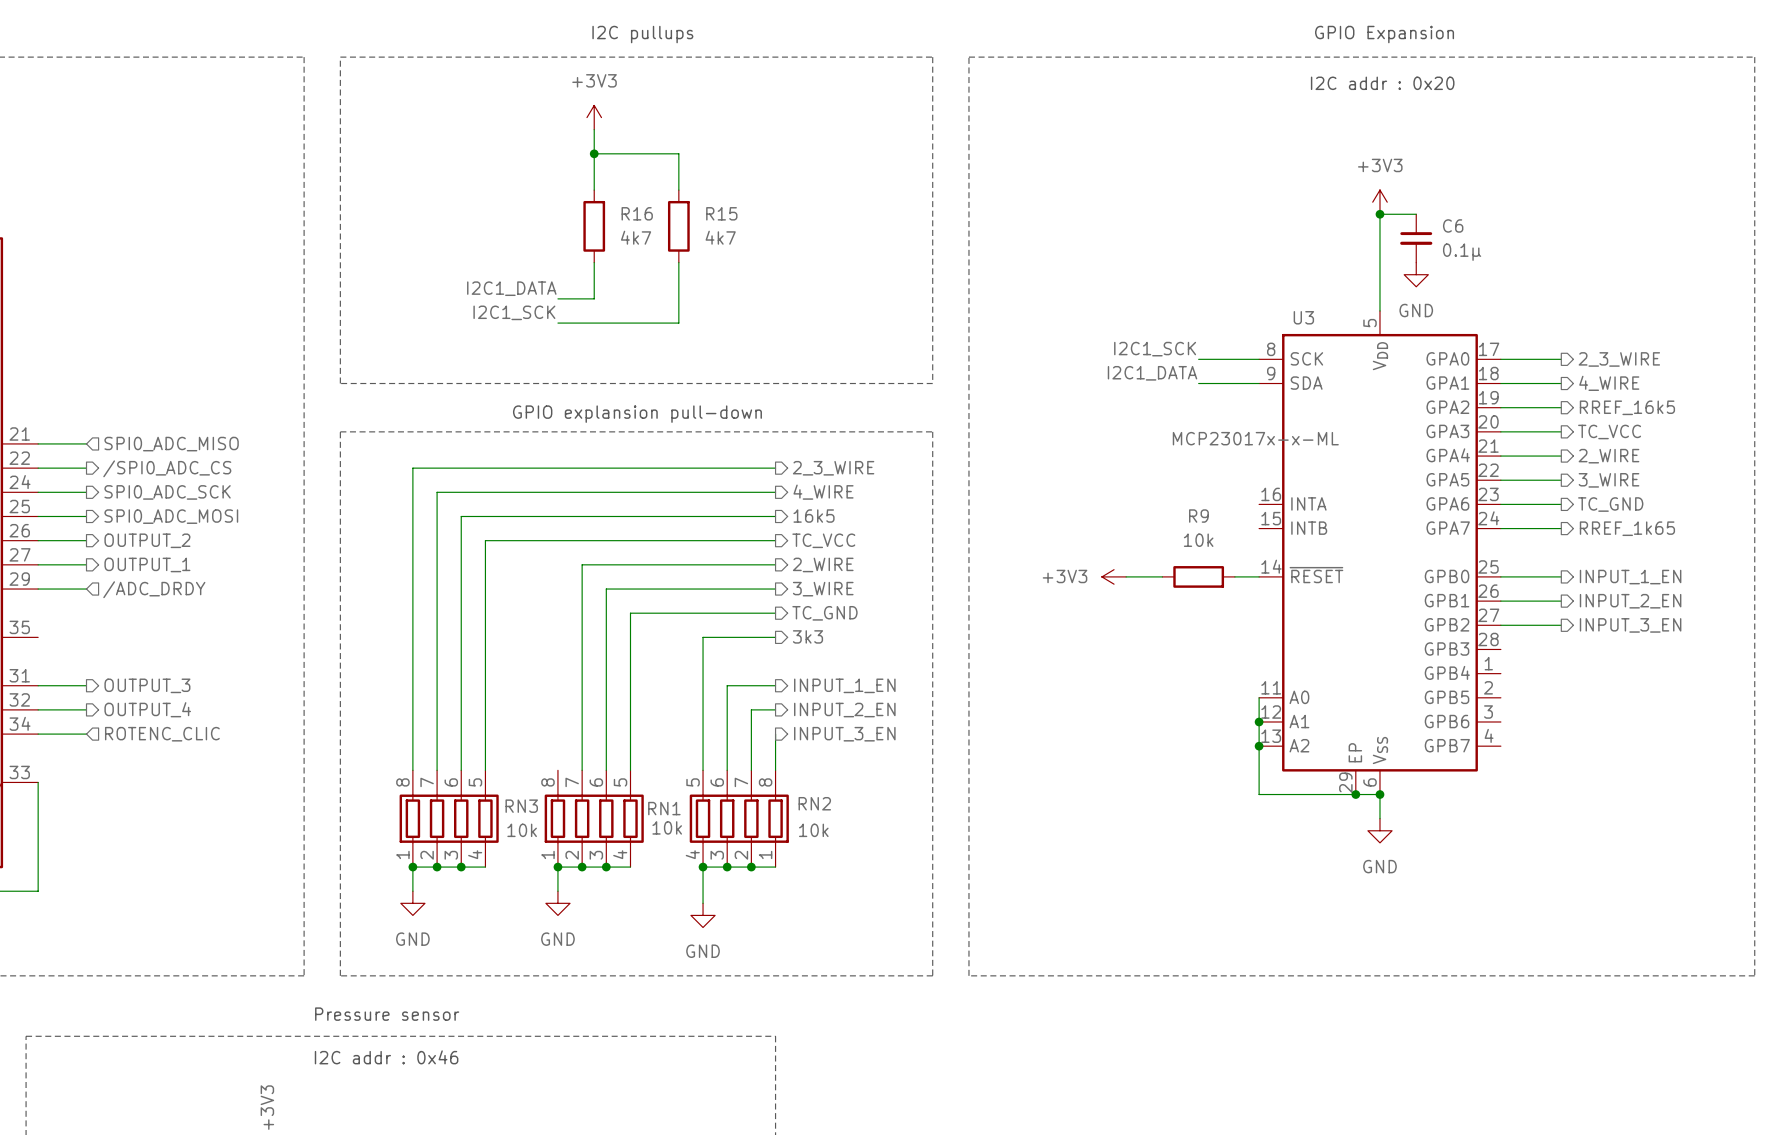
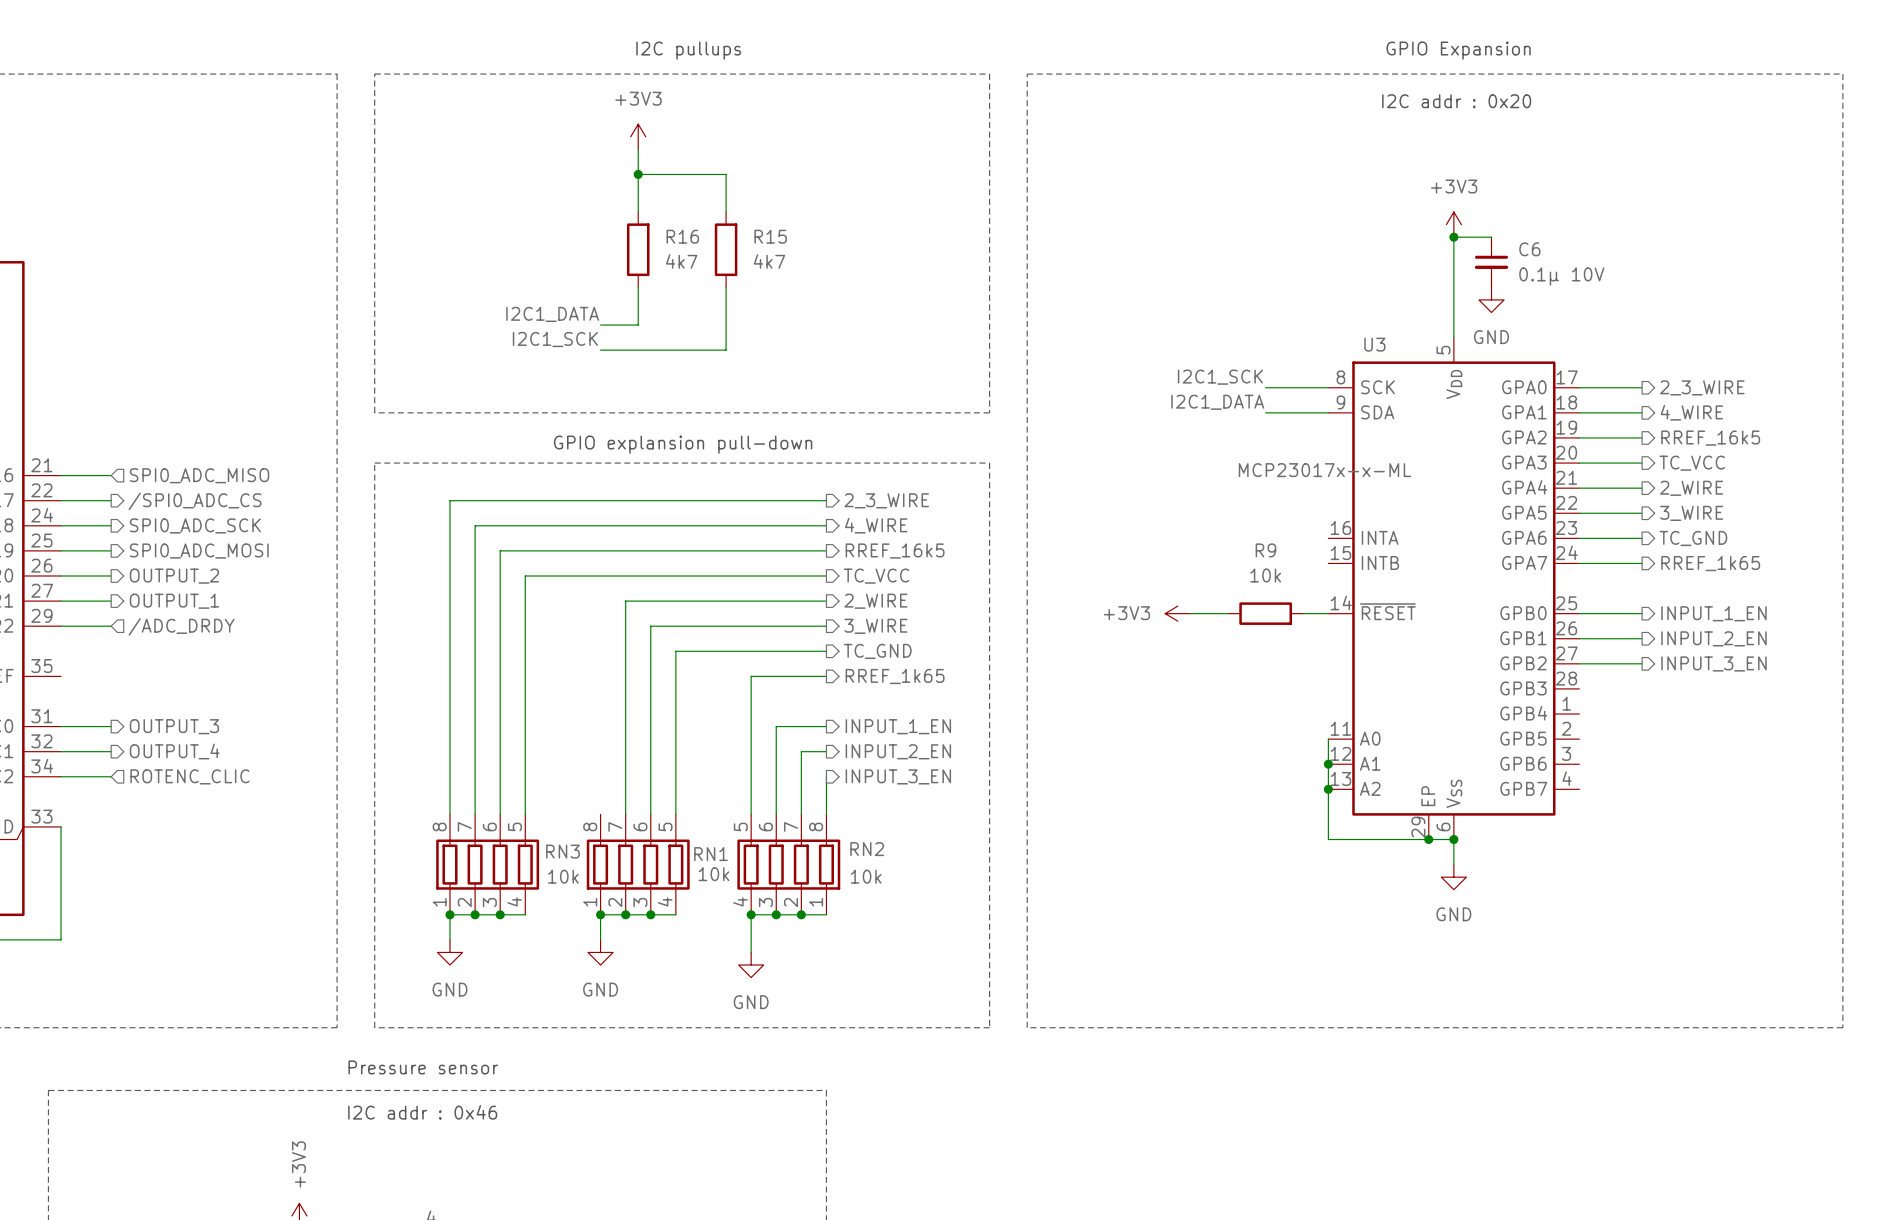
C6 value: 0.1µ (1462, 252) -> 0.1µ 10V (1561, 276)
hierarchical label: 16k5 (814, 516) -> RREF_16k5 (895, 551)
hierarchical label: 3k3 (807, 636) -> RREF_1k65 (895, 676)

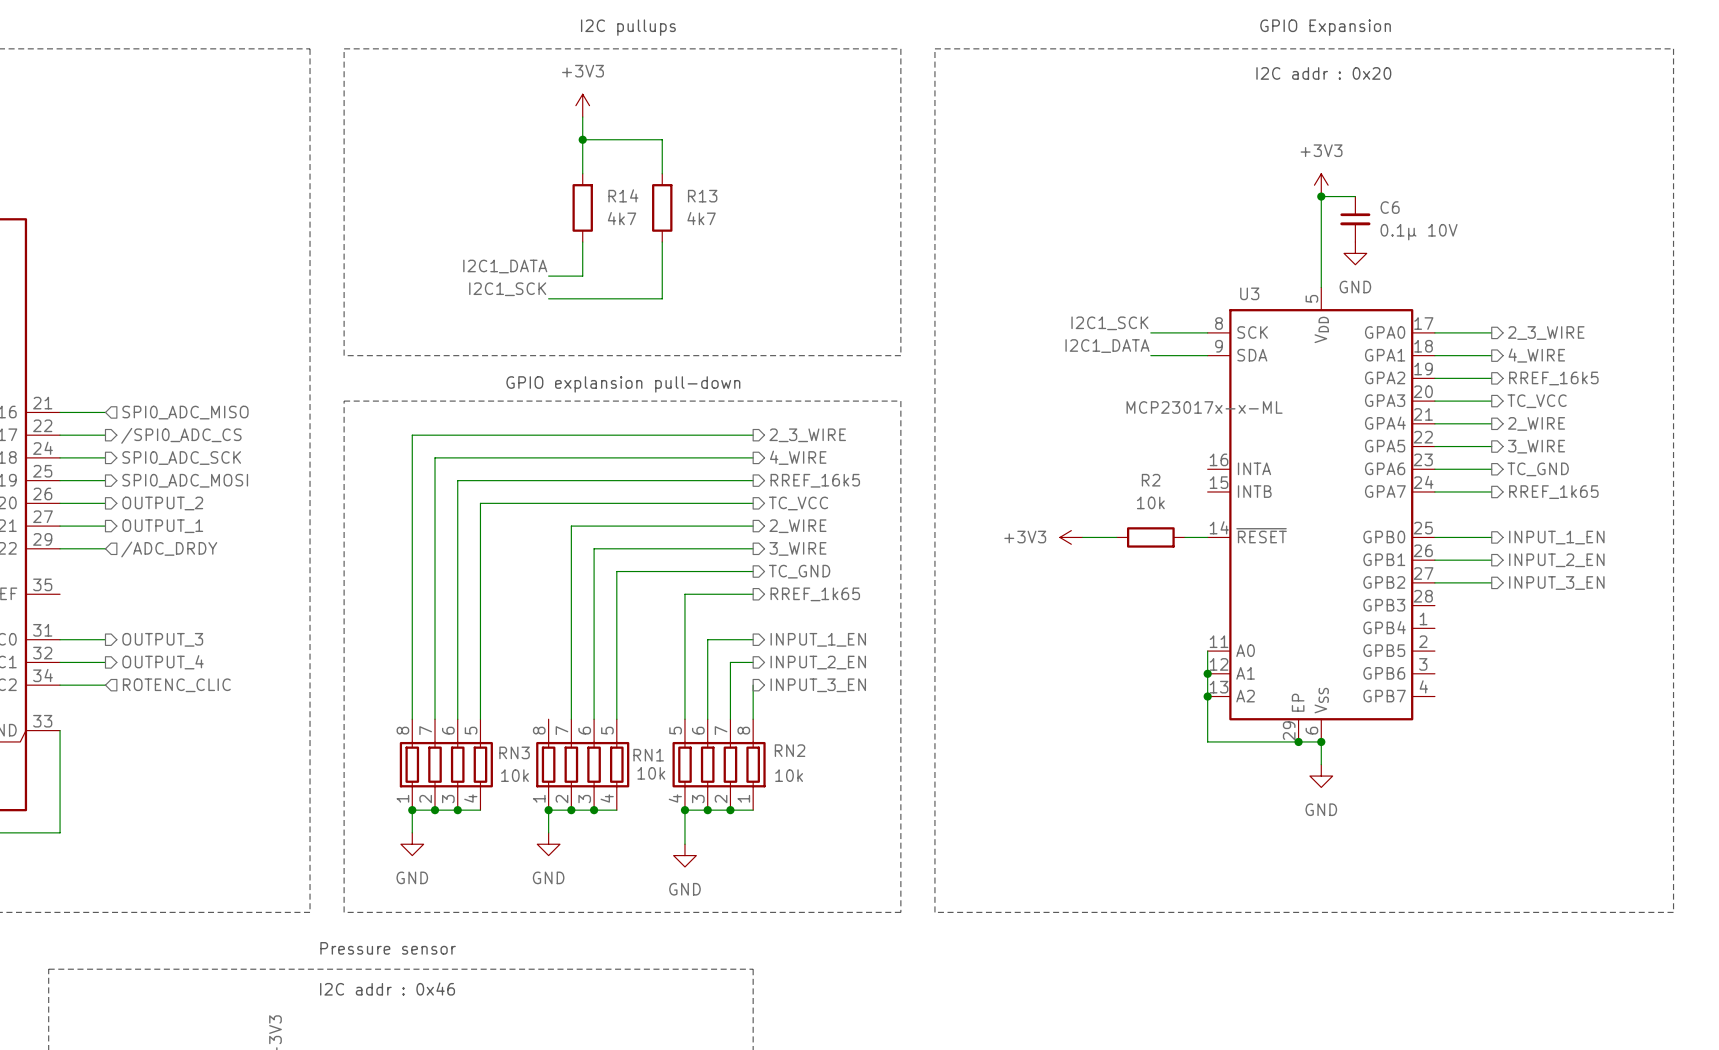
R16 name: R16 (682, 236) -> R14 (623, 195)
R15 name: R15 (770, 236) -> R13 (702, 196)
R9 name: R9 (1265, 550) -> R2 (1151, 480)

